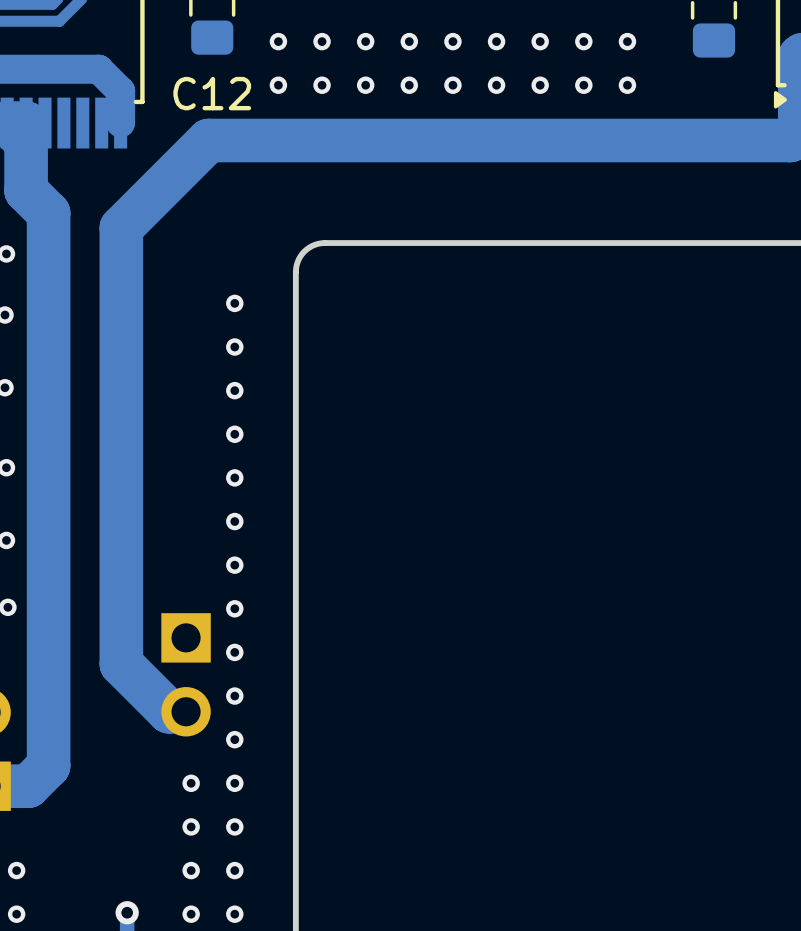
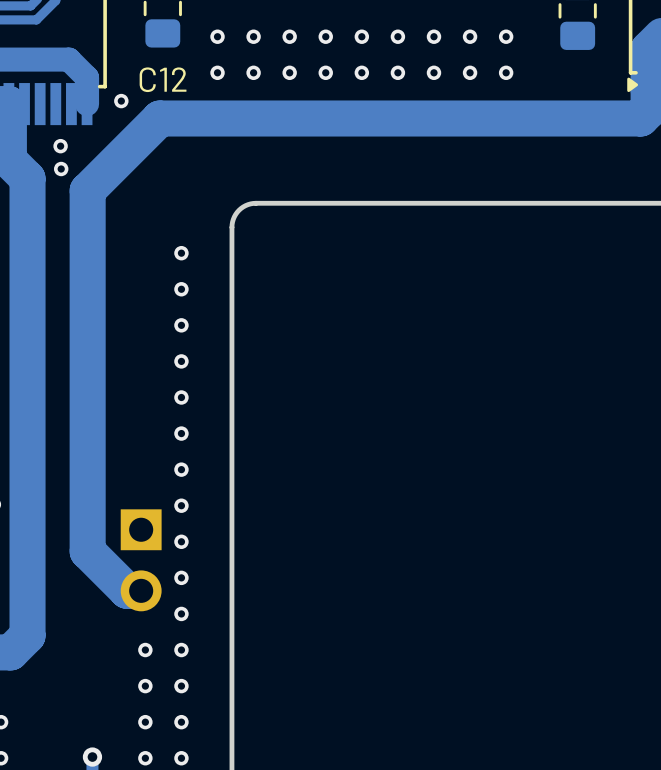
via: none -> (121, 101)
via: none -> (60, 146)
via: none -> (61, 169)

